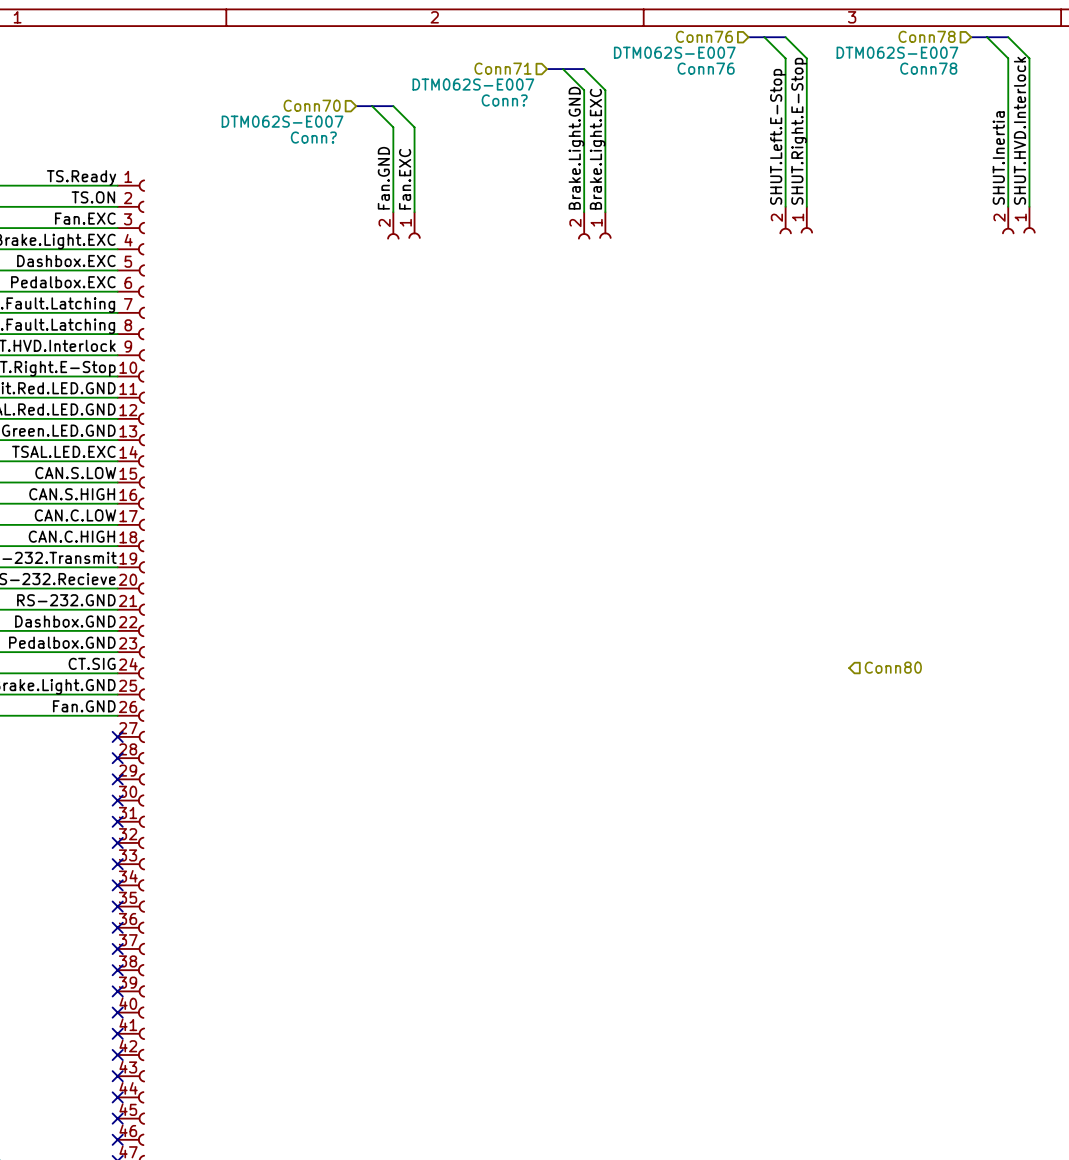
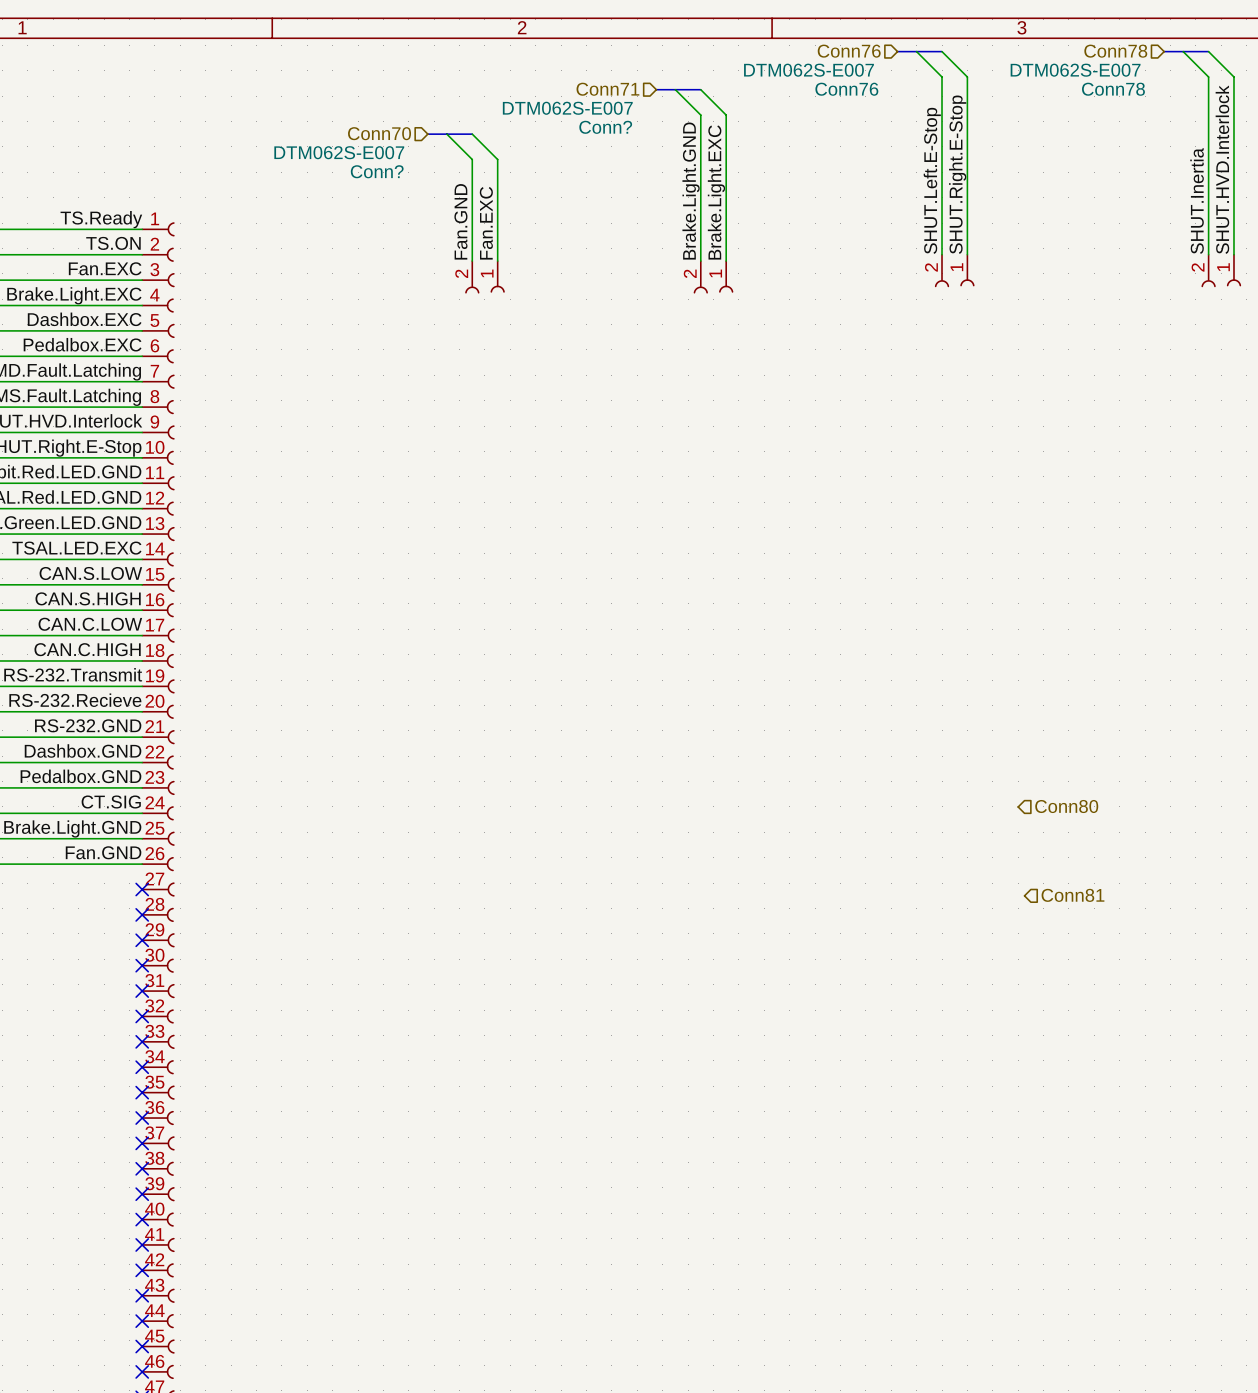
hierarchical label: none -> Conn81 (1072, 895)

